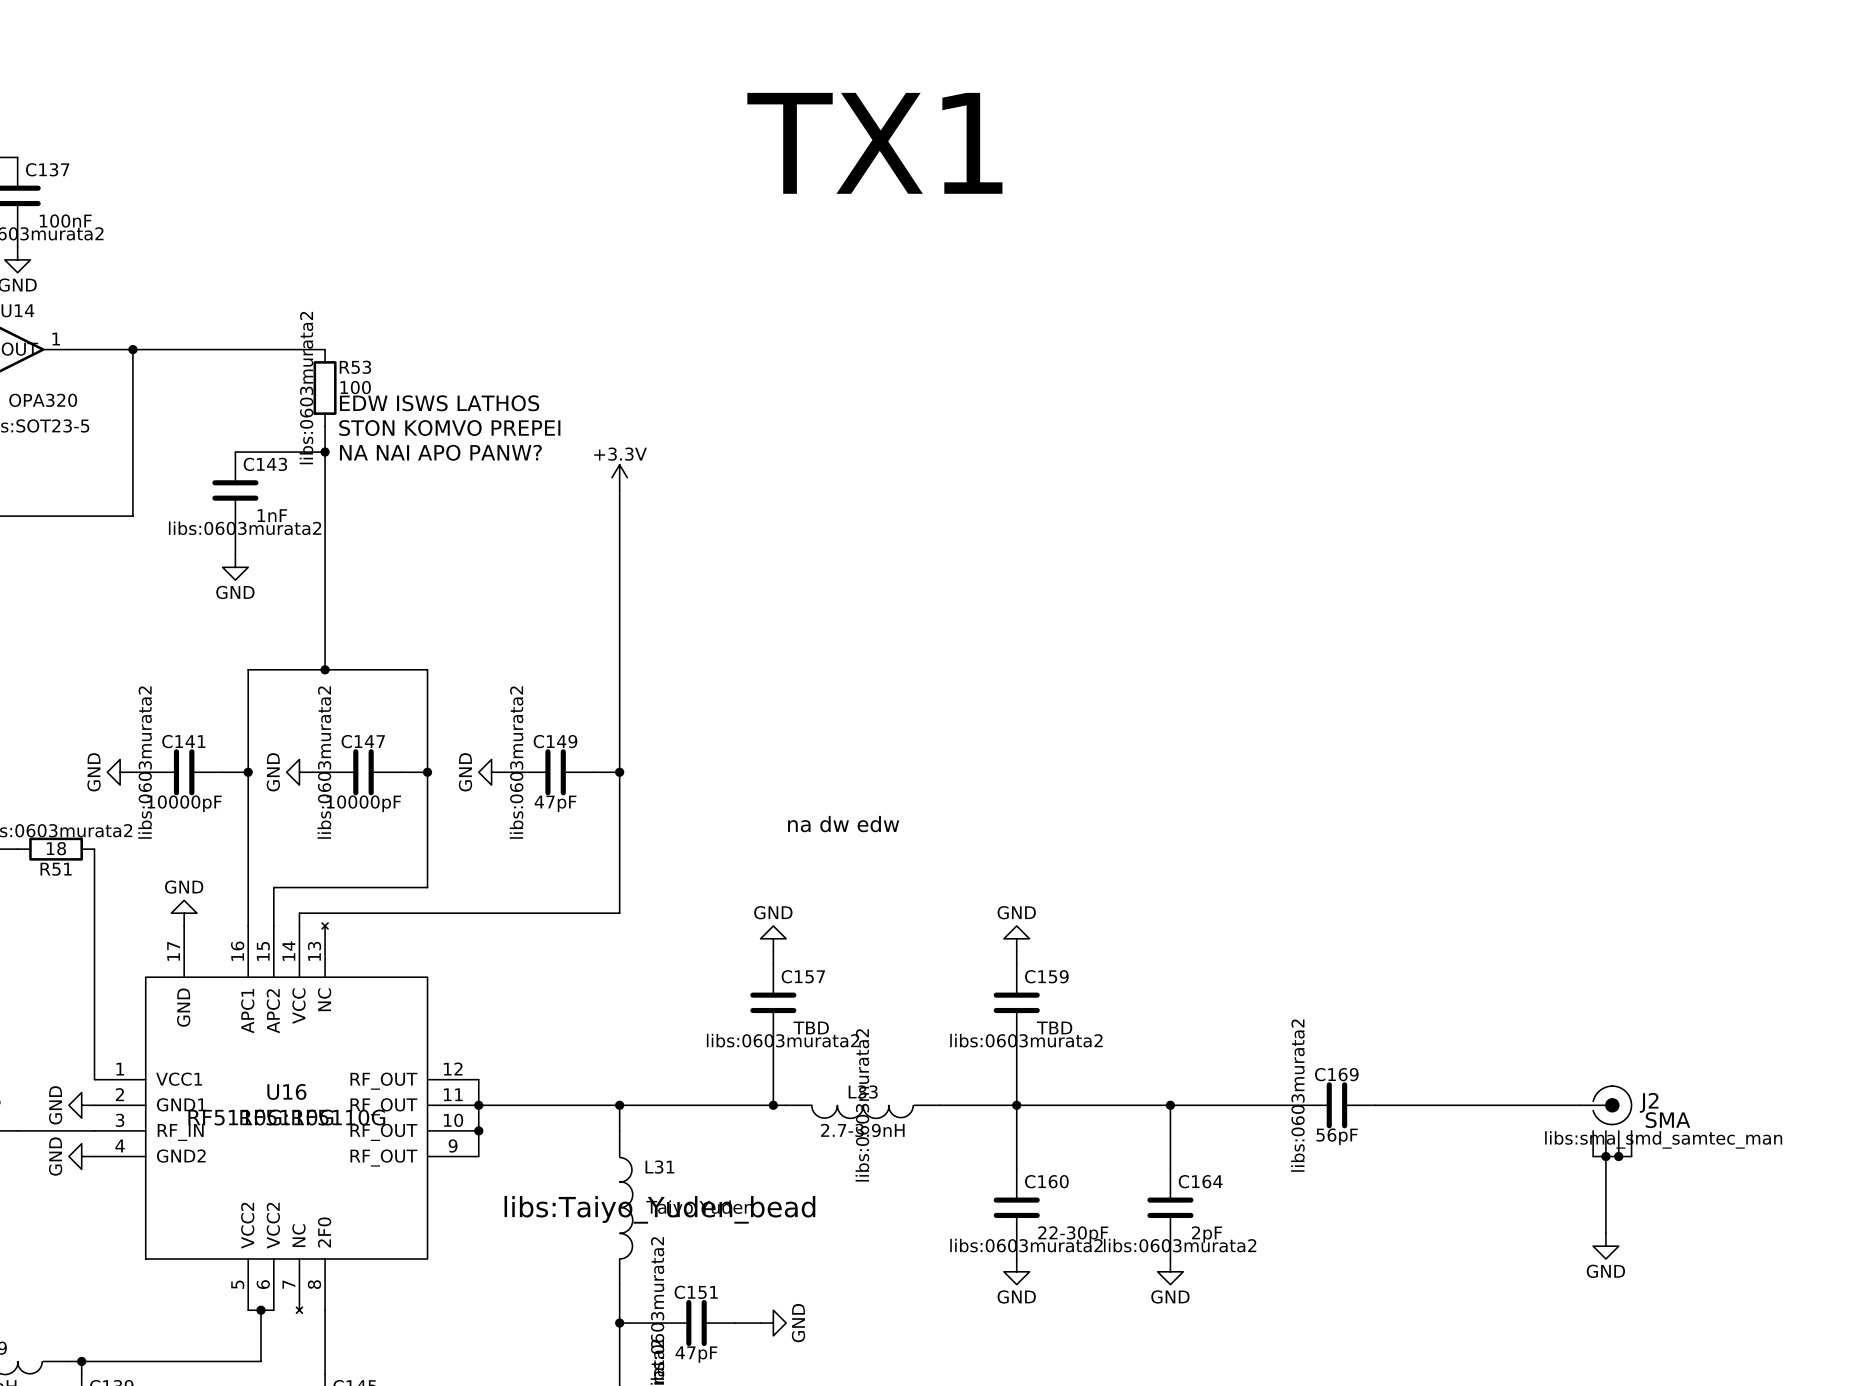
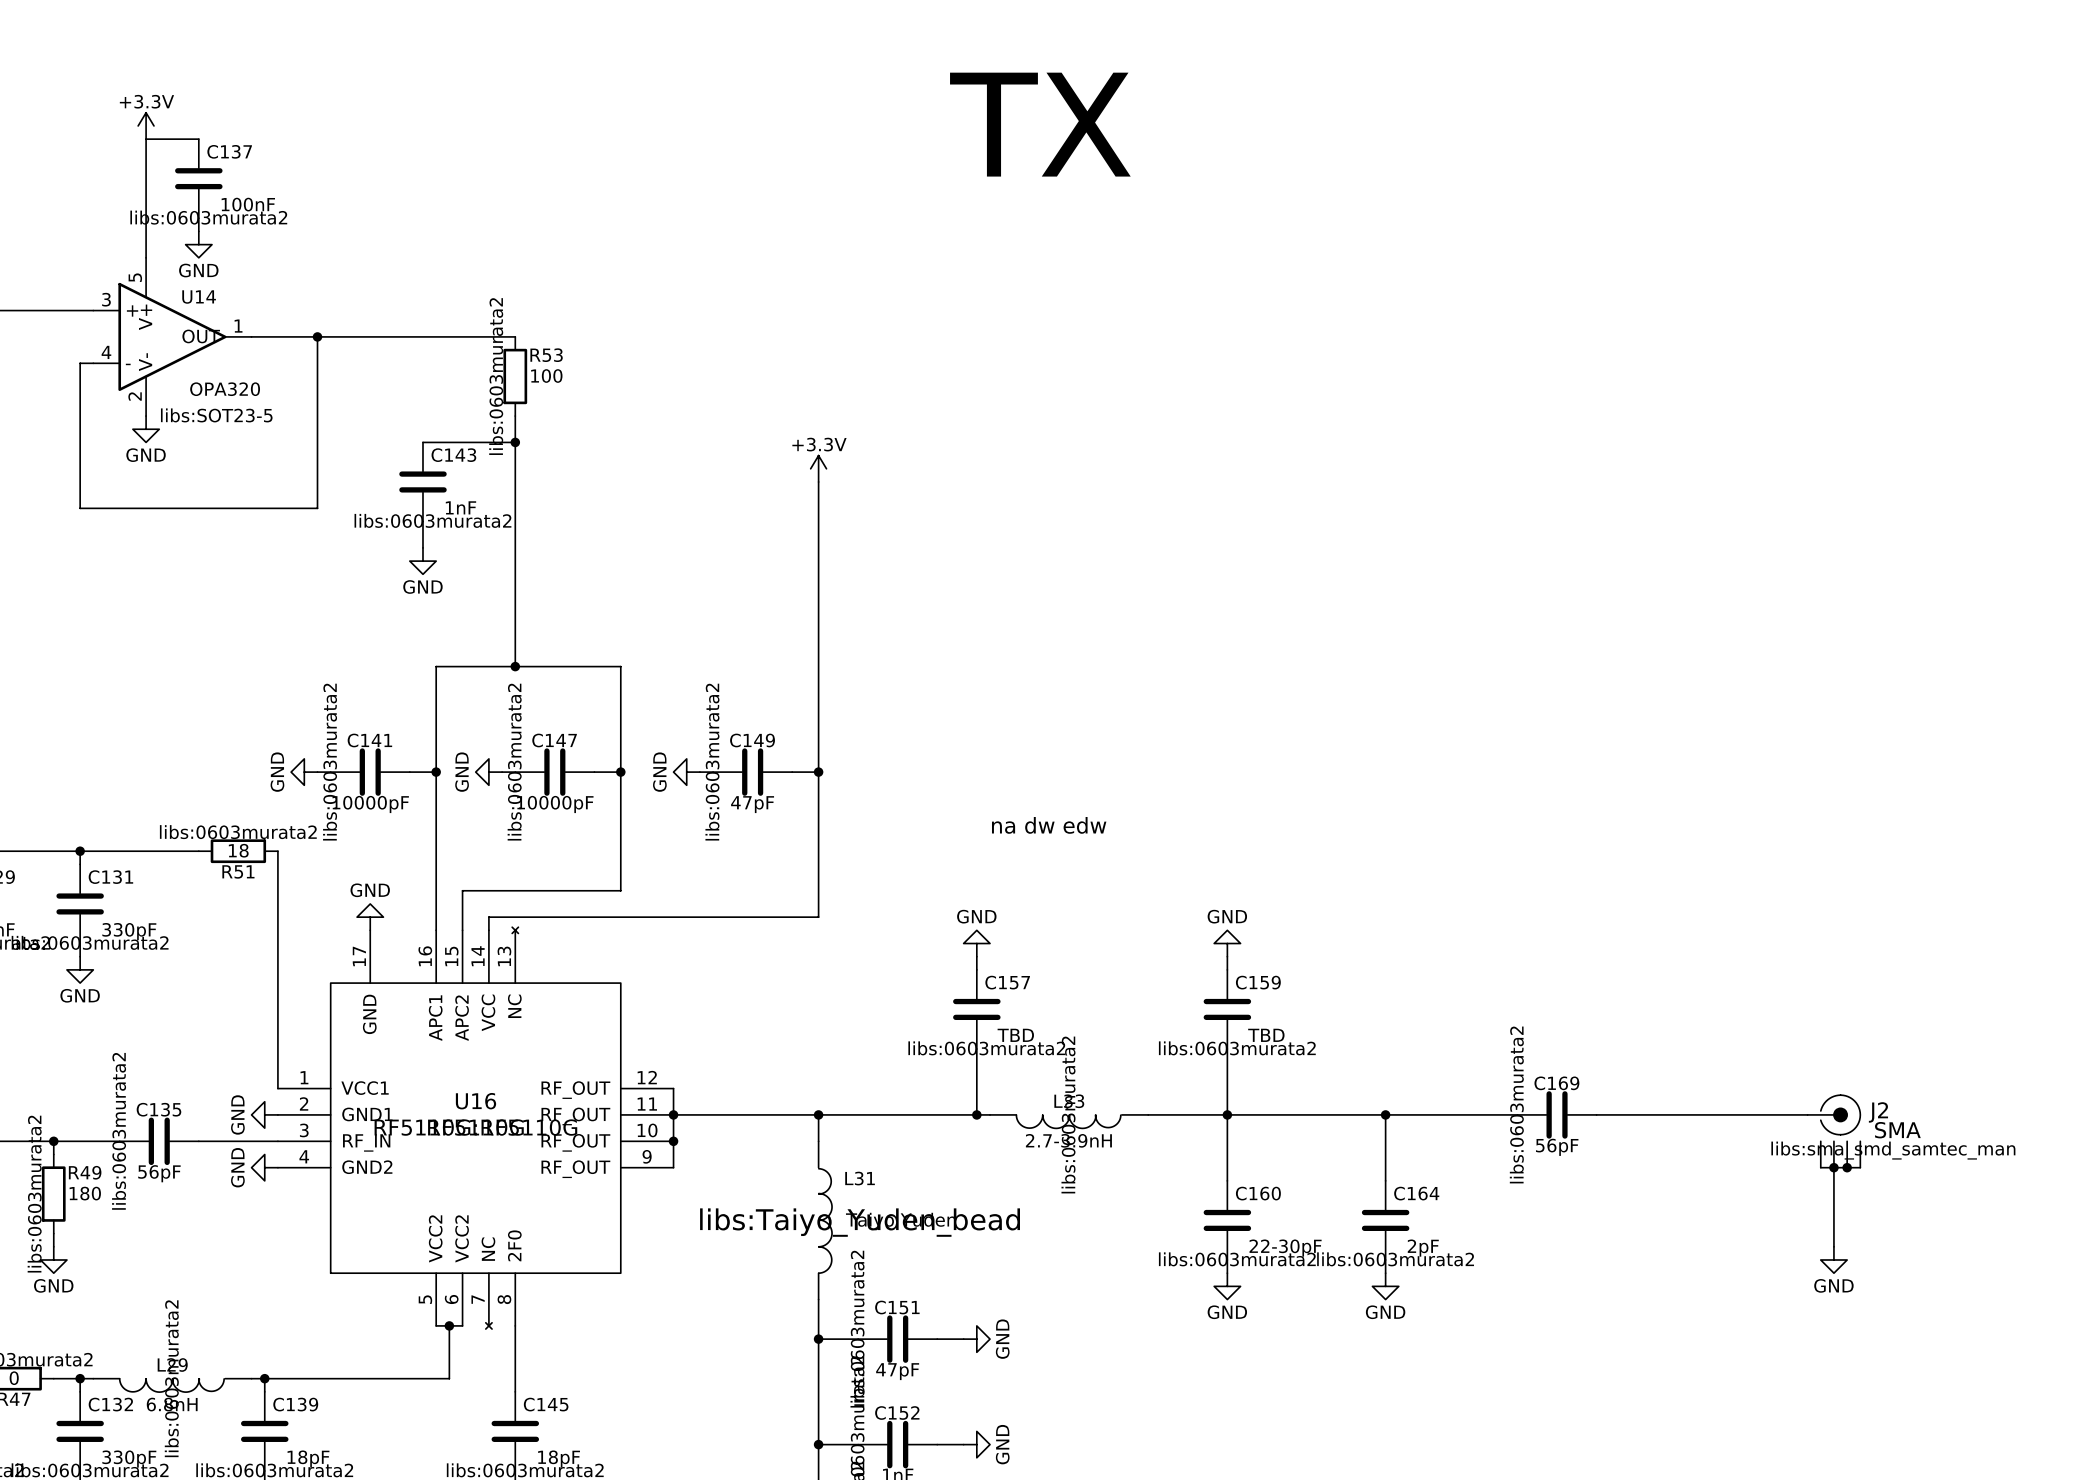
text: TX1 (874, 143) -> TX (1040, 124)
text: EDW ISWS LATHOS (439, 403) -> none
text: STON KOMVO PREPEI (449, 428) -> none
text: NA NAI APO PANW? (440, 452) -> none

